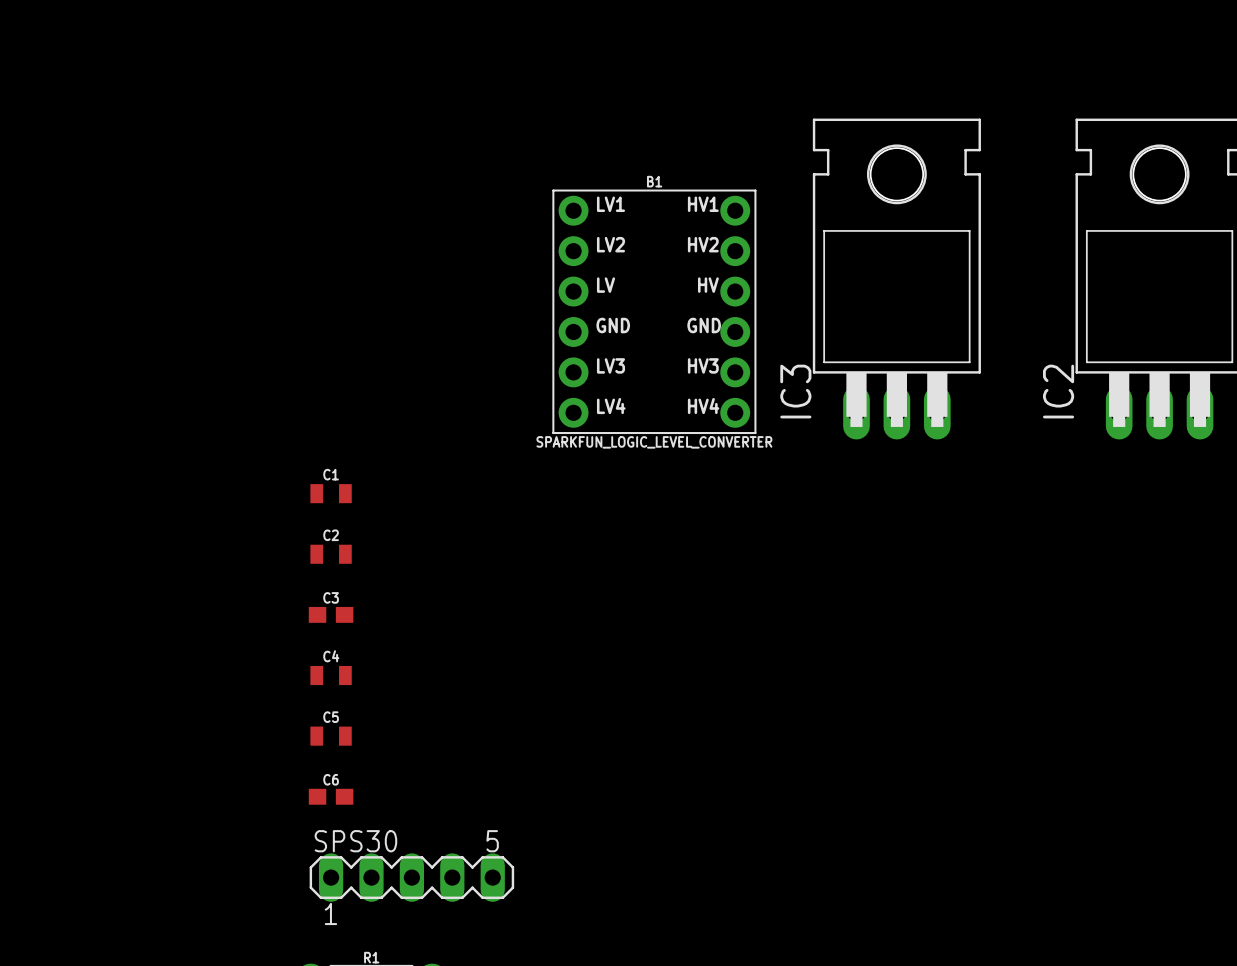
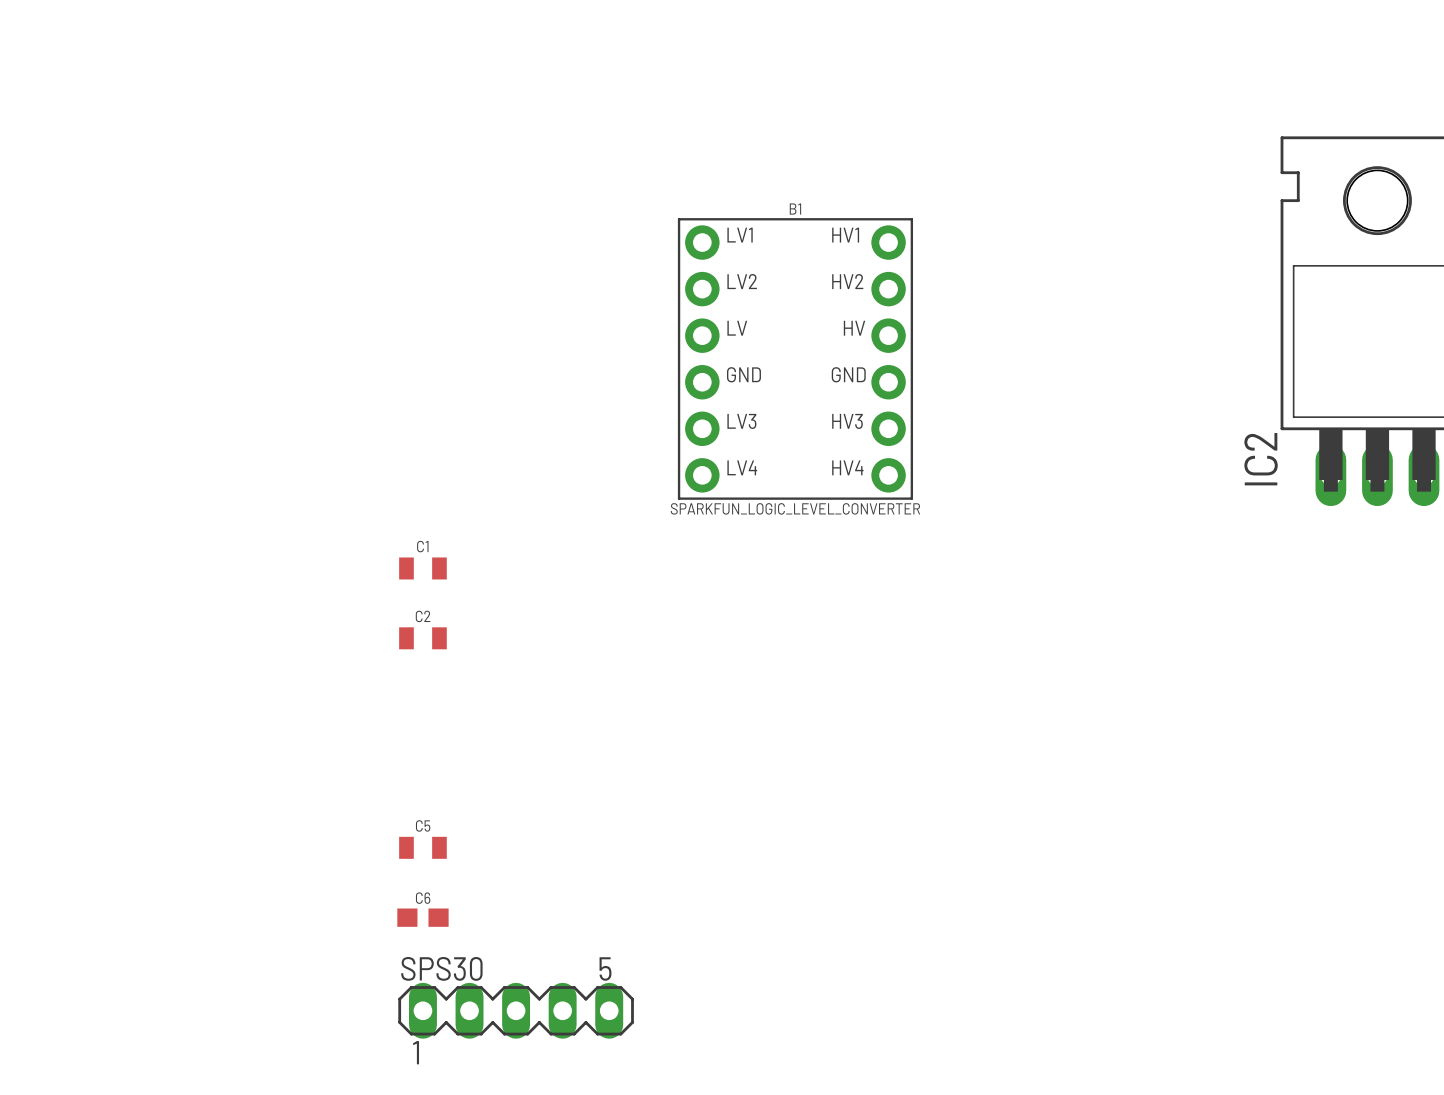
IC3: (896, 279) -> none
C3: (331, 614) -> none
C4: (331, 675) -> none

